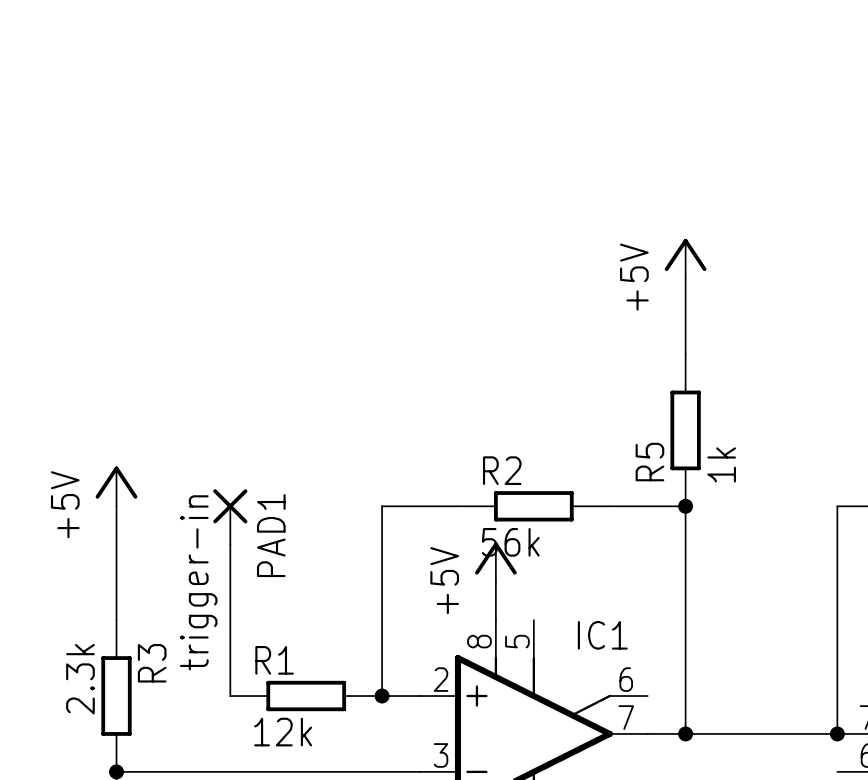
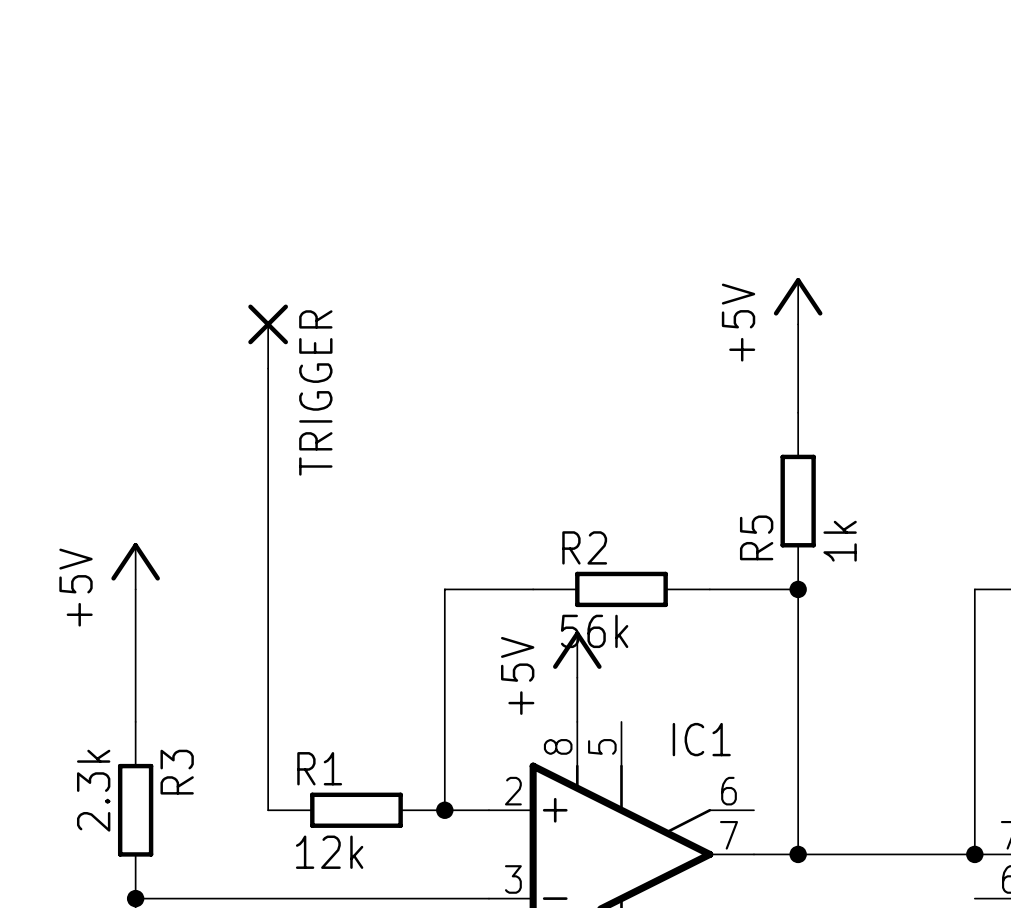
TRIGGER: none -> (268, 336)
wire: none -> (268, 368) (268, 633)
PAD1: trigger-in (230, 516) -> none

